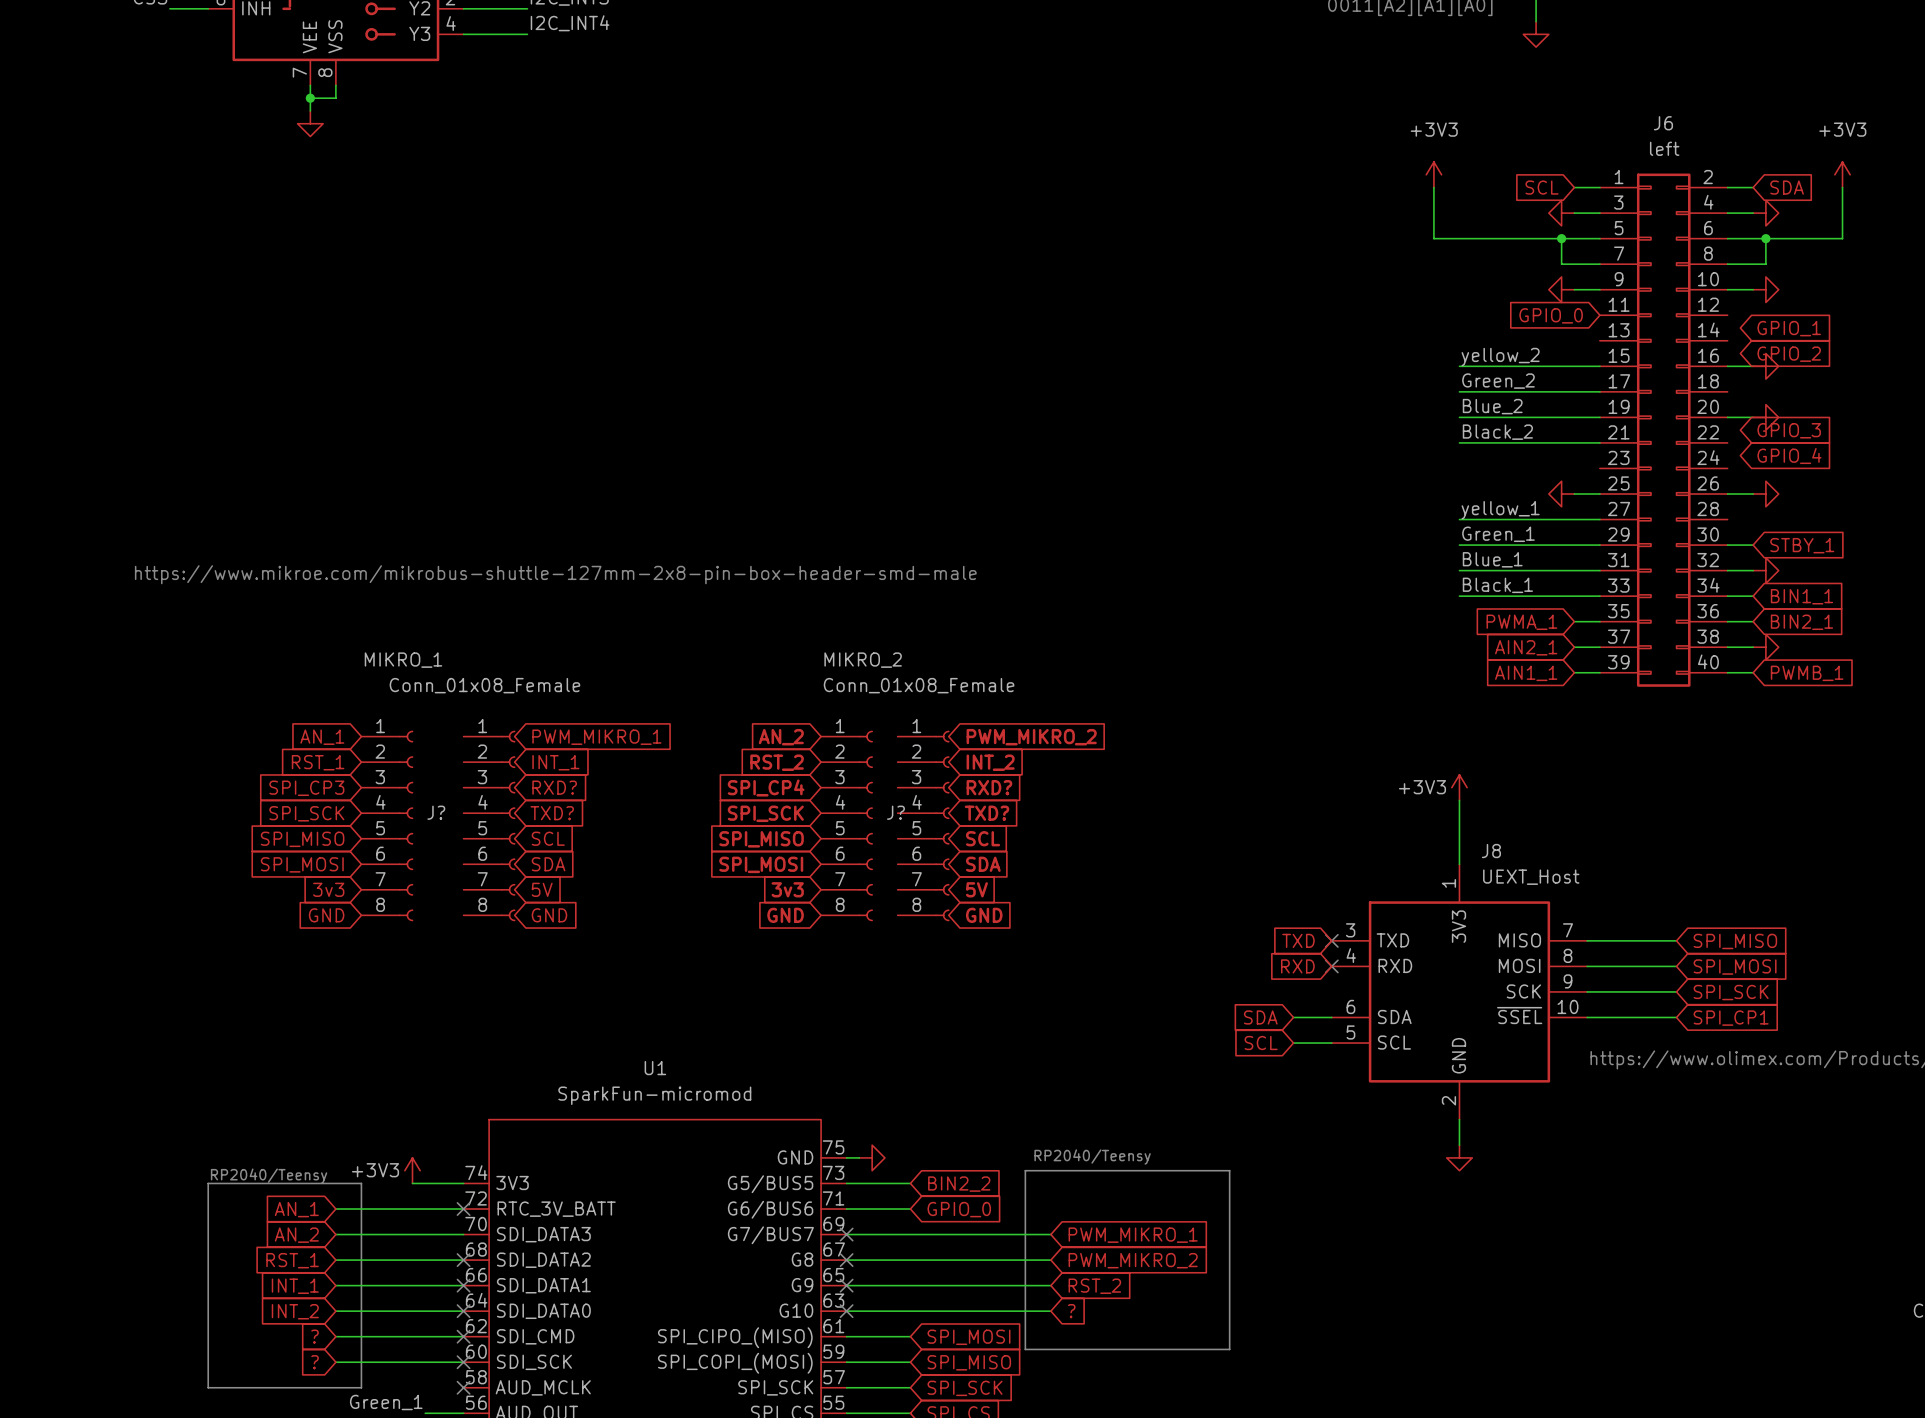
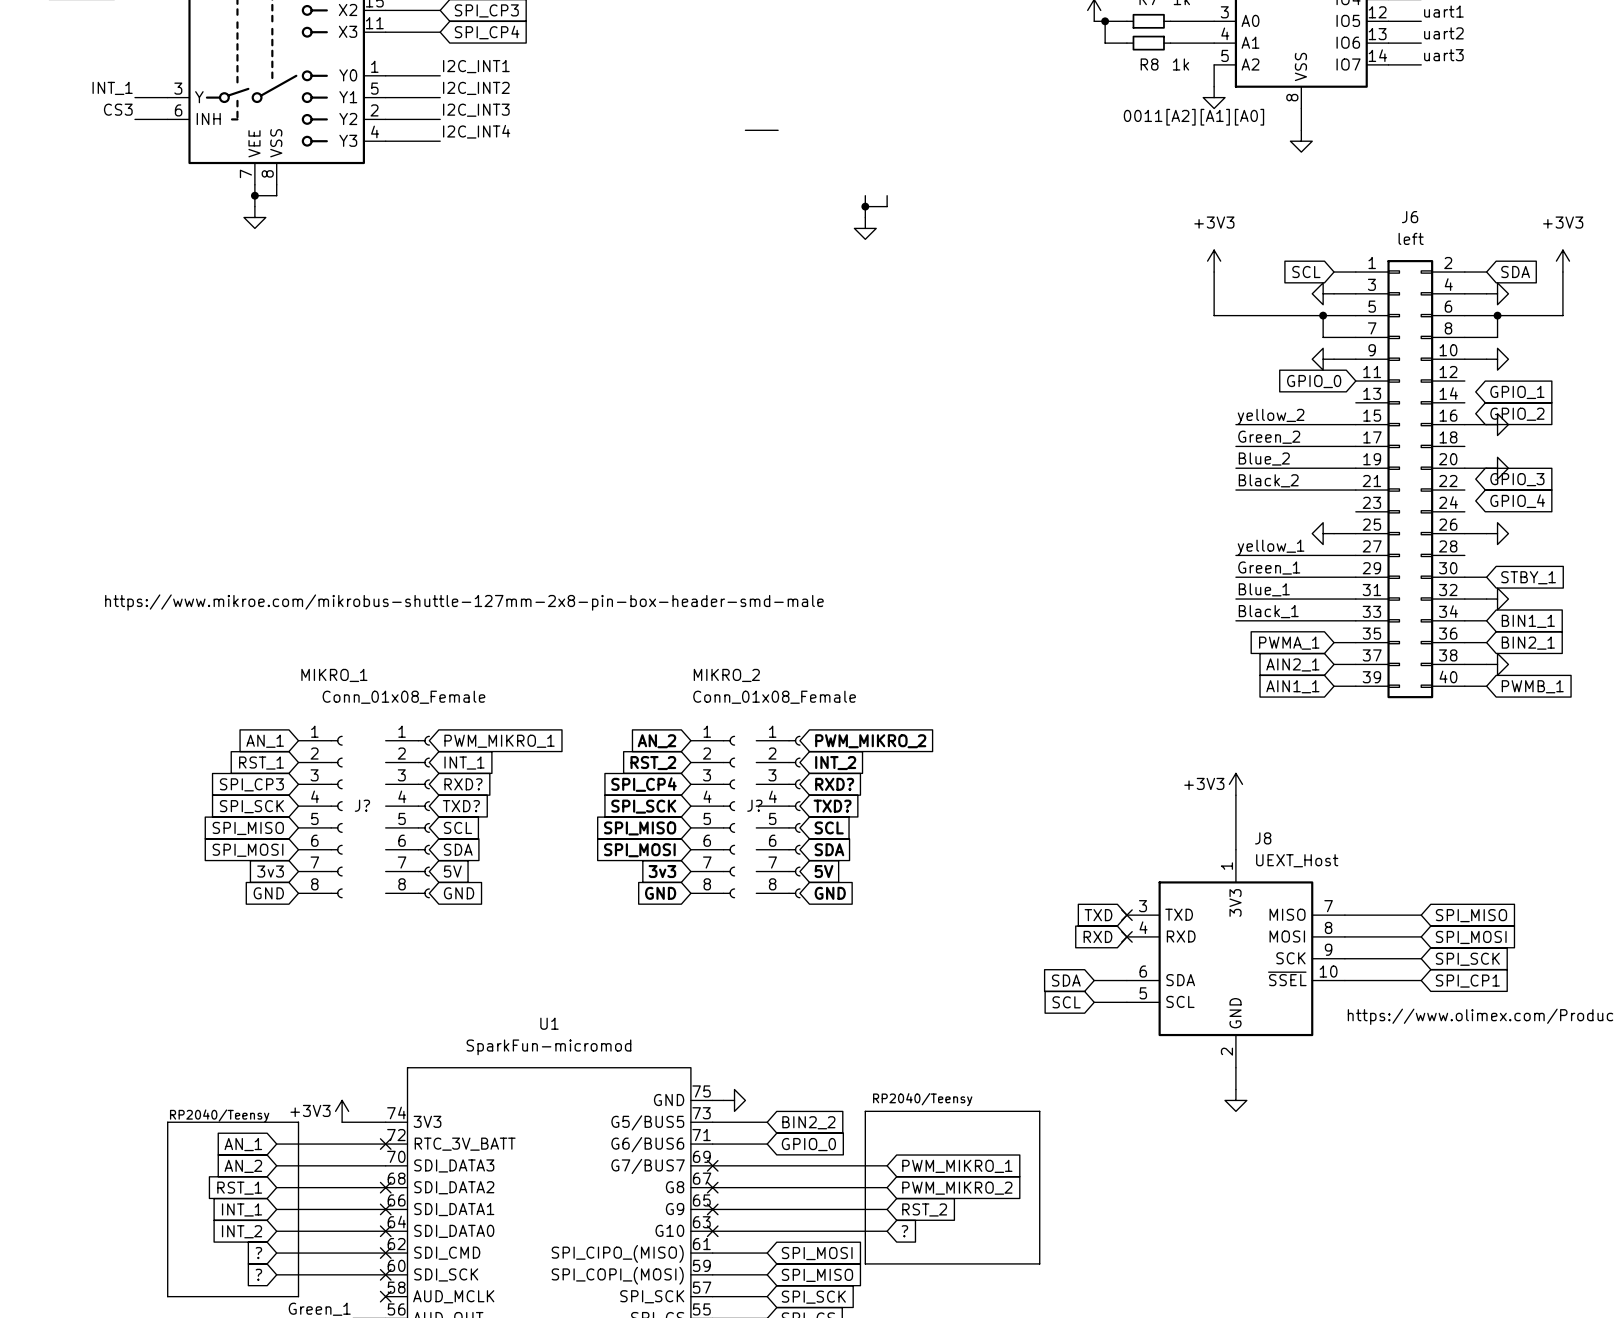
wire: none -> (745, 130) (778, 130)
wire: none -> (865, 195) (865, 217)
wire: none -> (887, 195) (887, 206) (865, 206)
junction: none -> (865, 206)
power symbol: none -> (865, 228)

